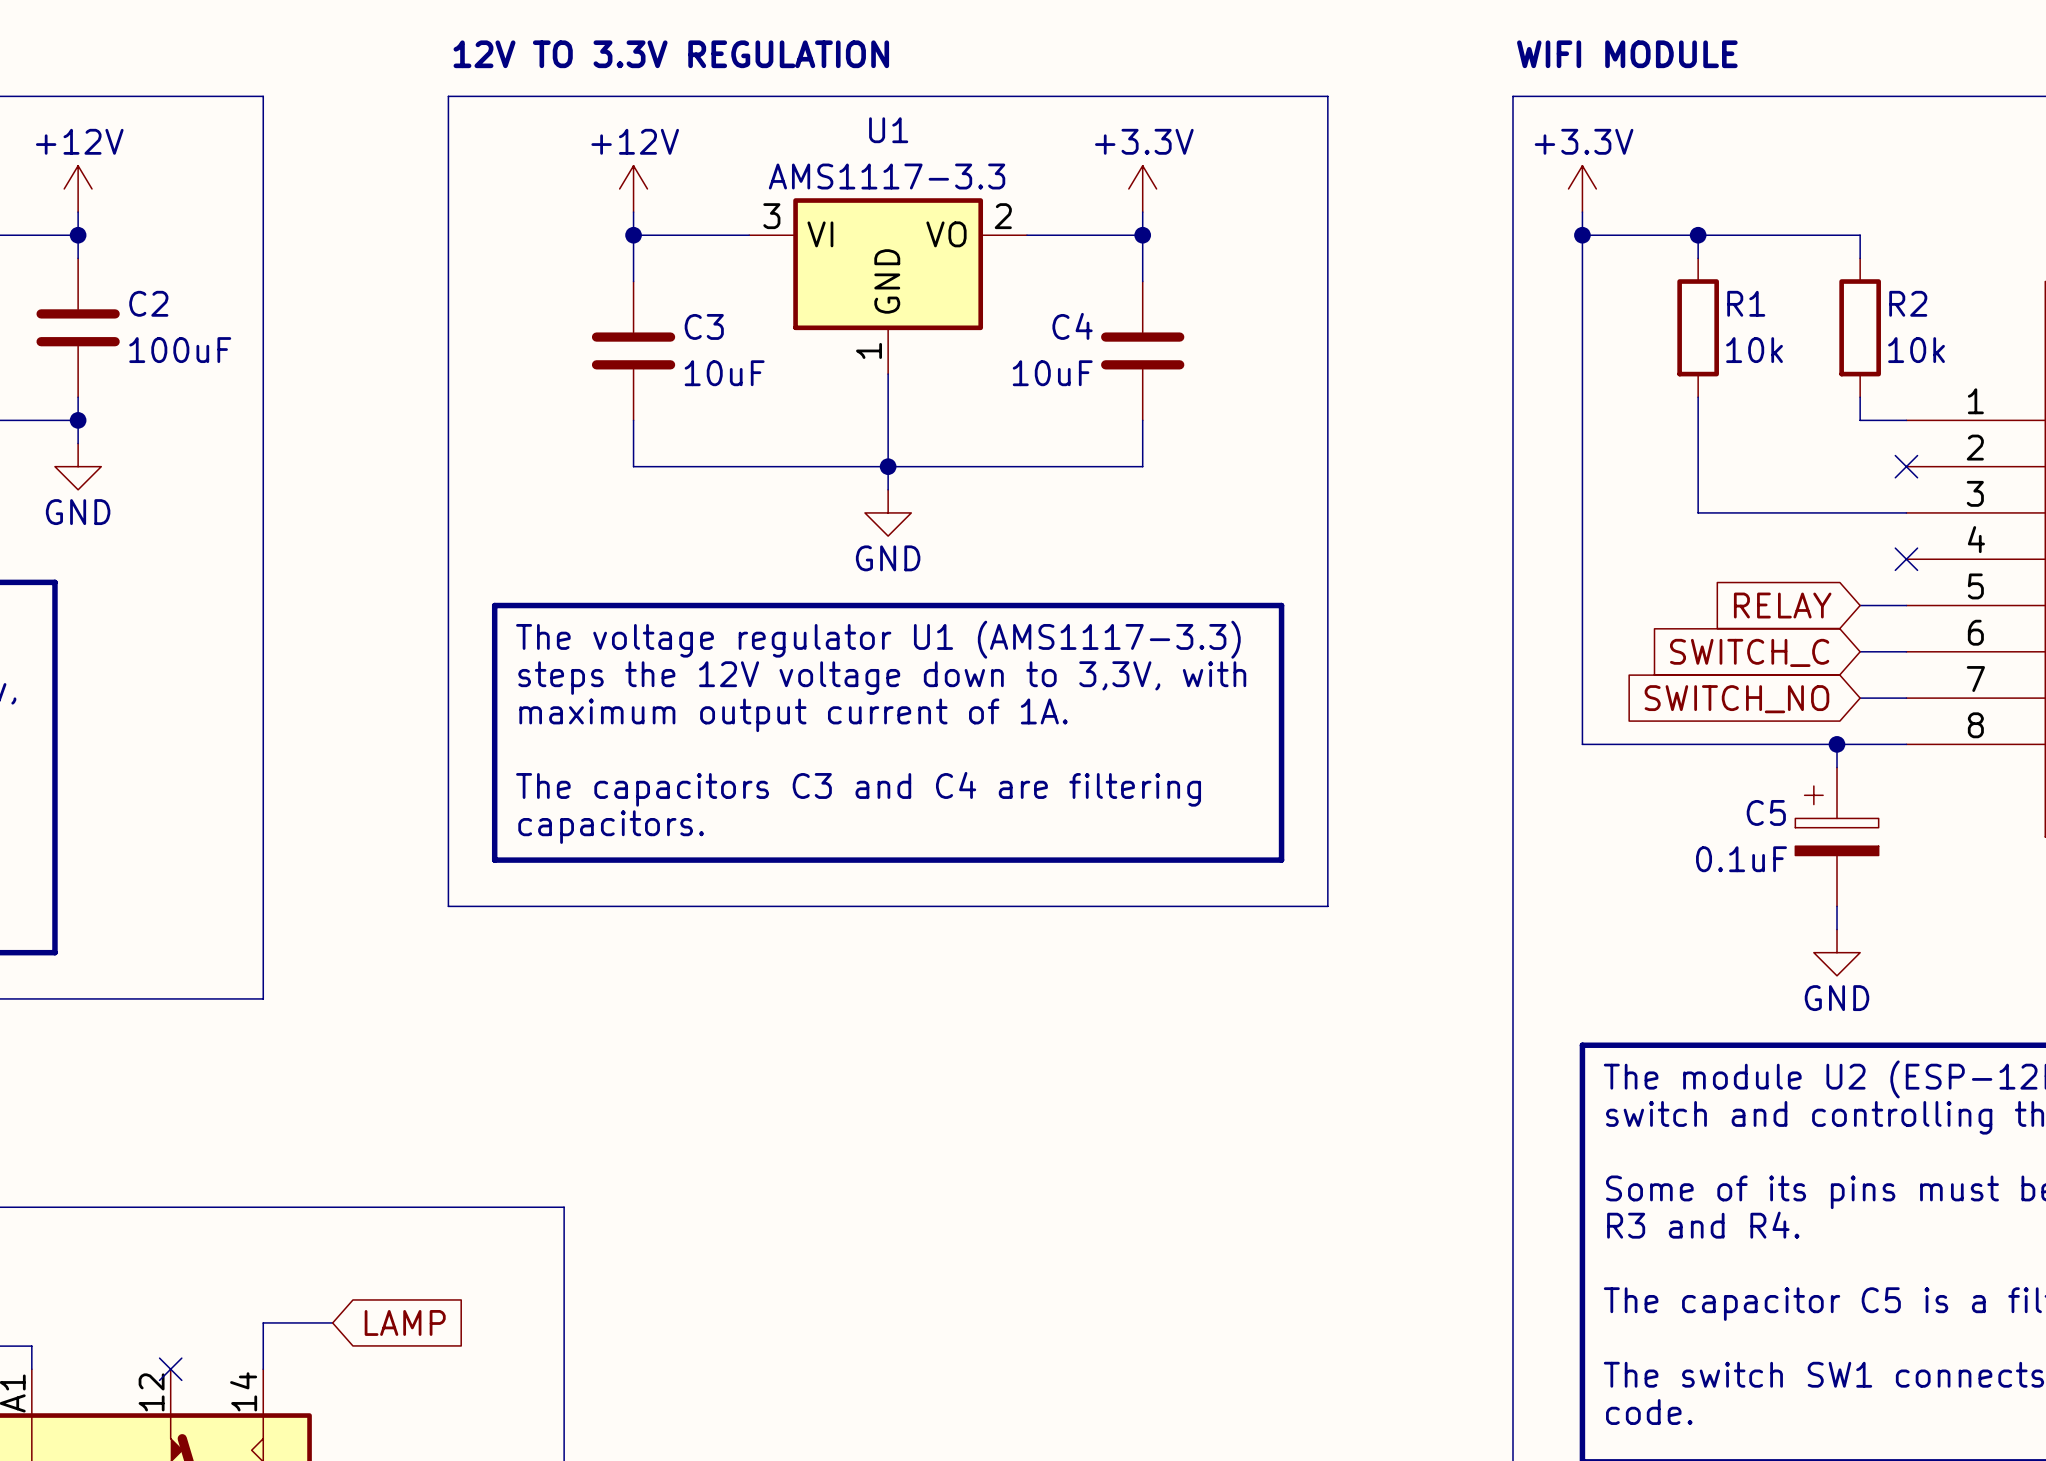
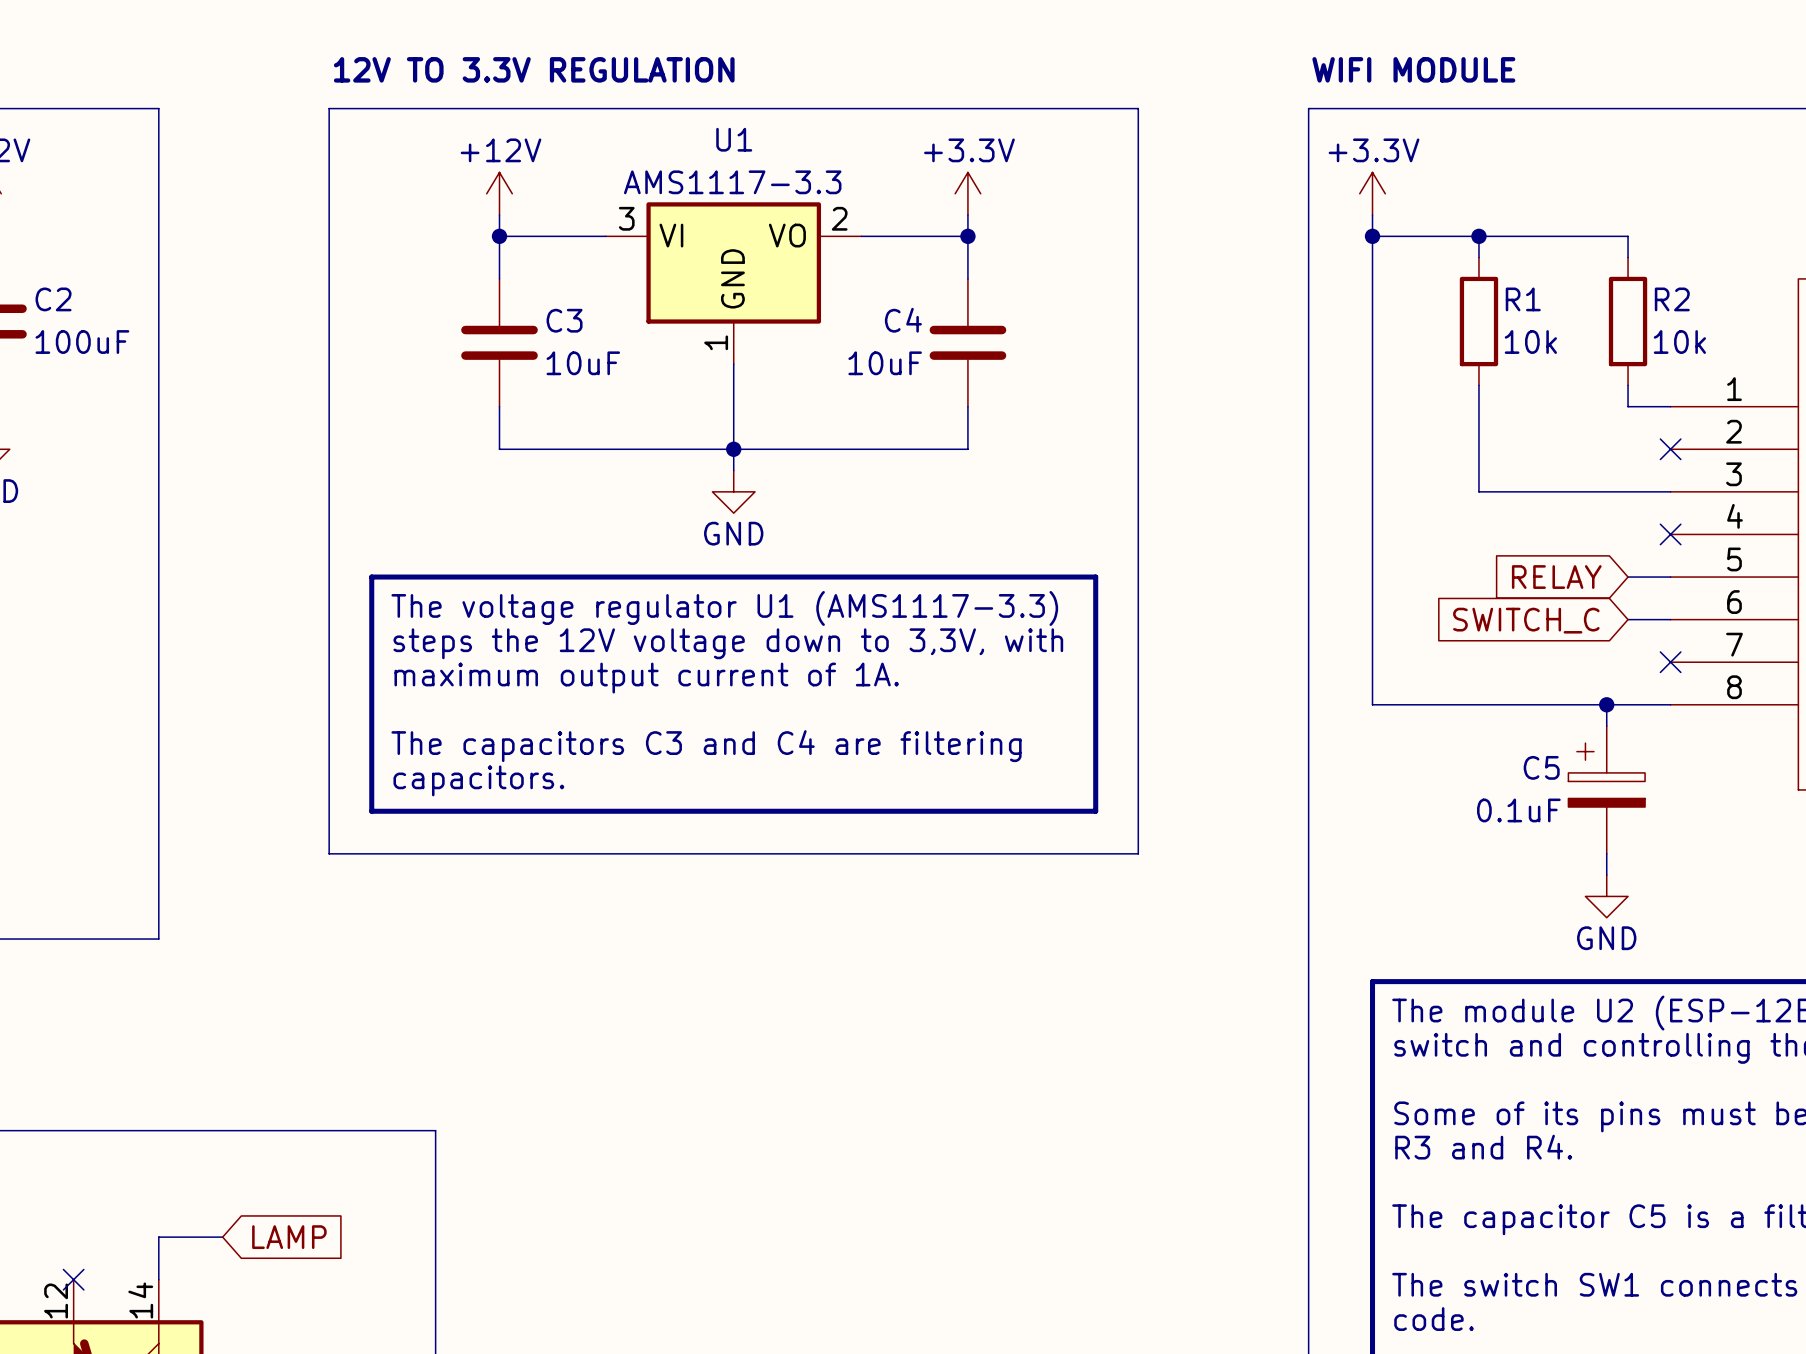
wire: (1860, 698) (1906, 698) -> none
no-connect mark: none -> (1670, 662)
global label: SWITCH_NO (1736, 699) -> none

